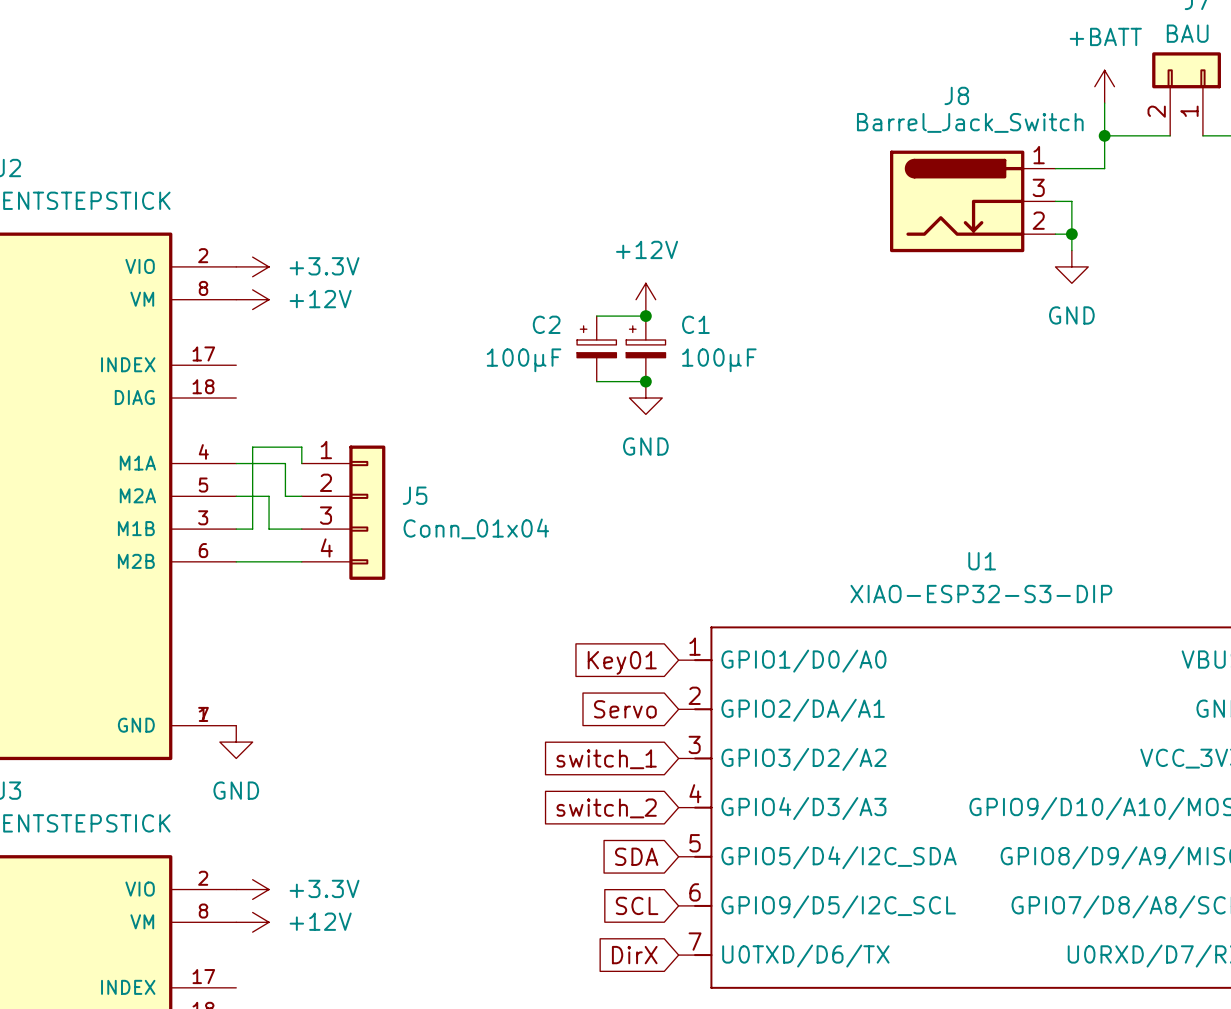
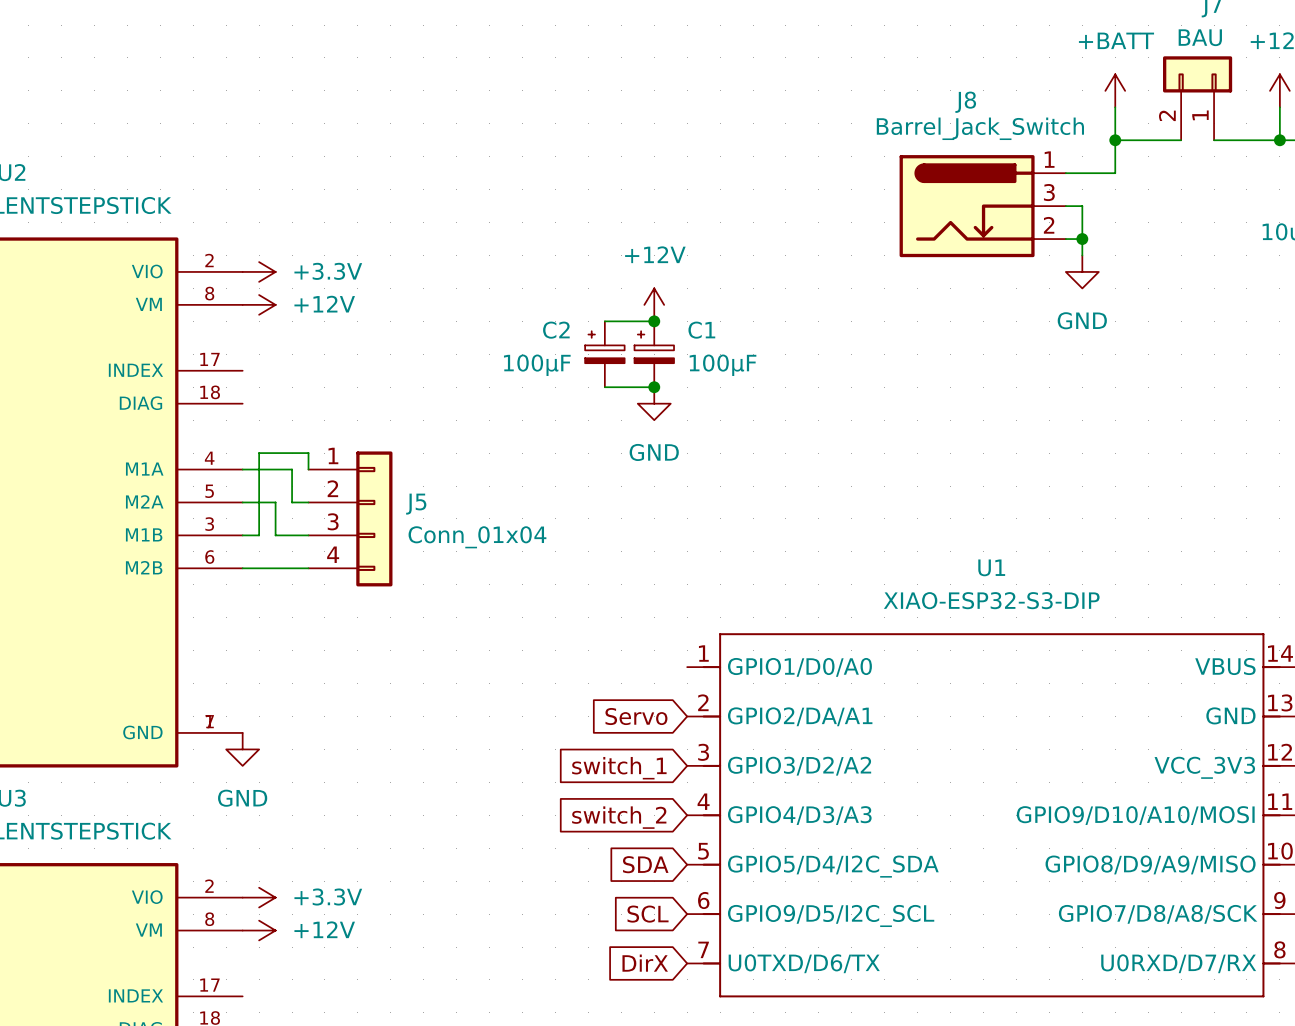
global label: Key01 (622, 662) -> none

